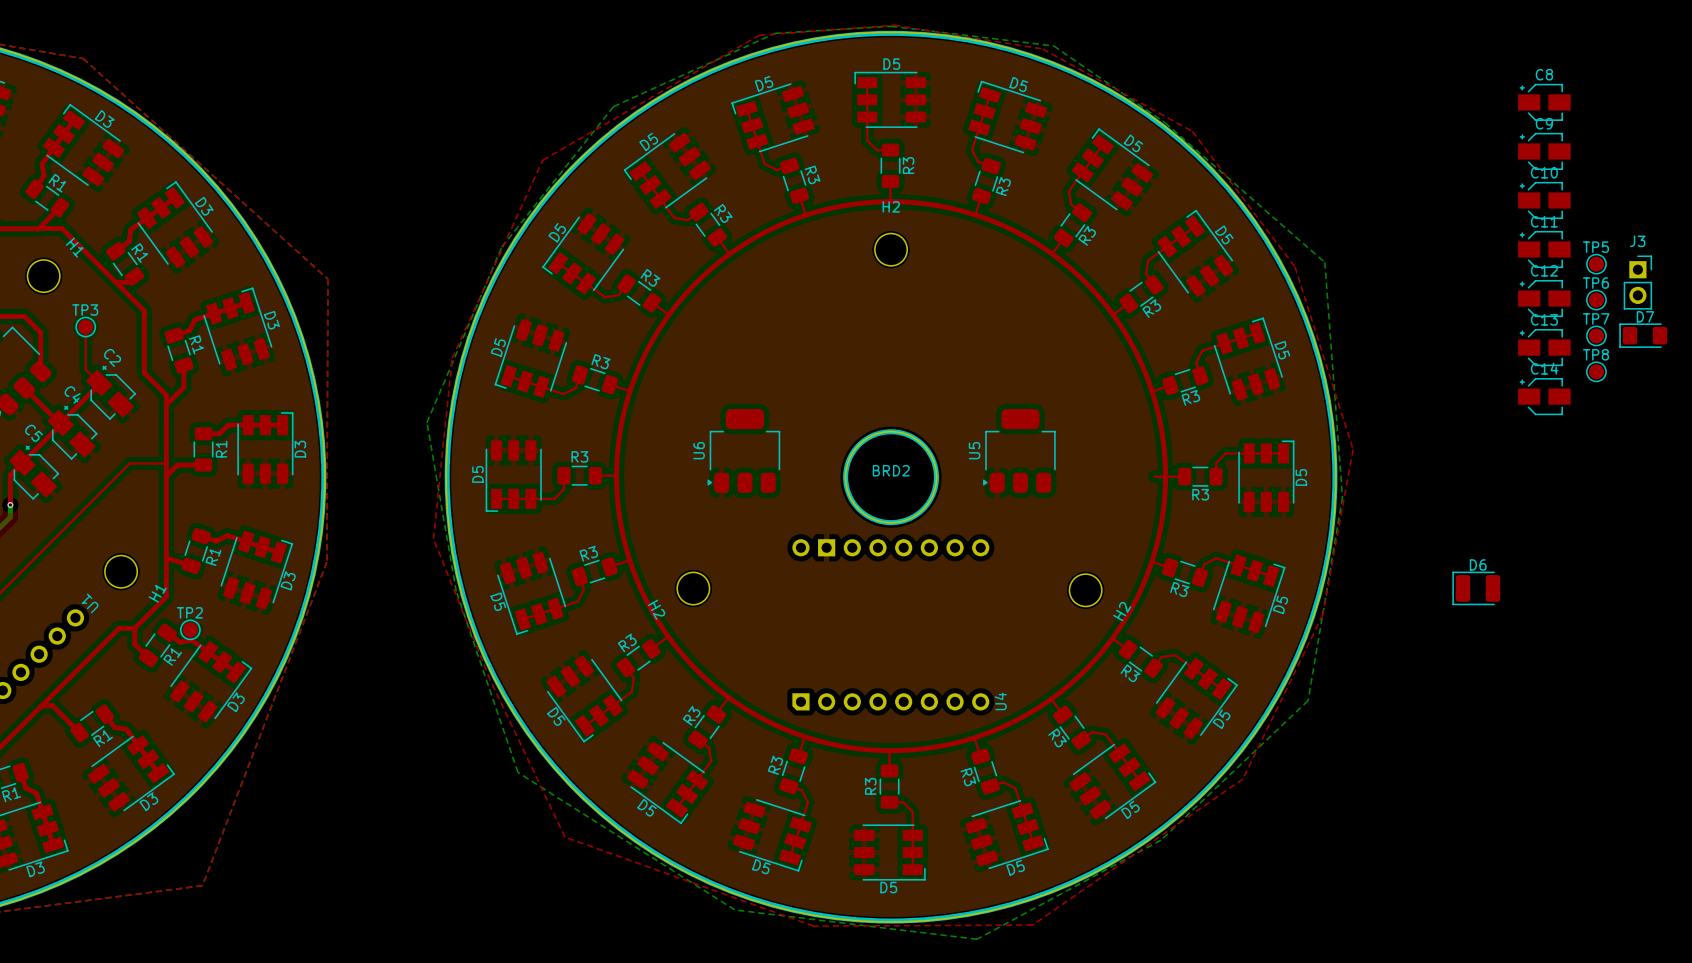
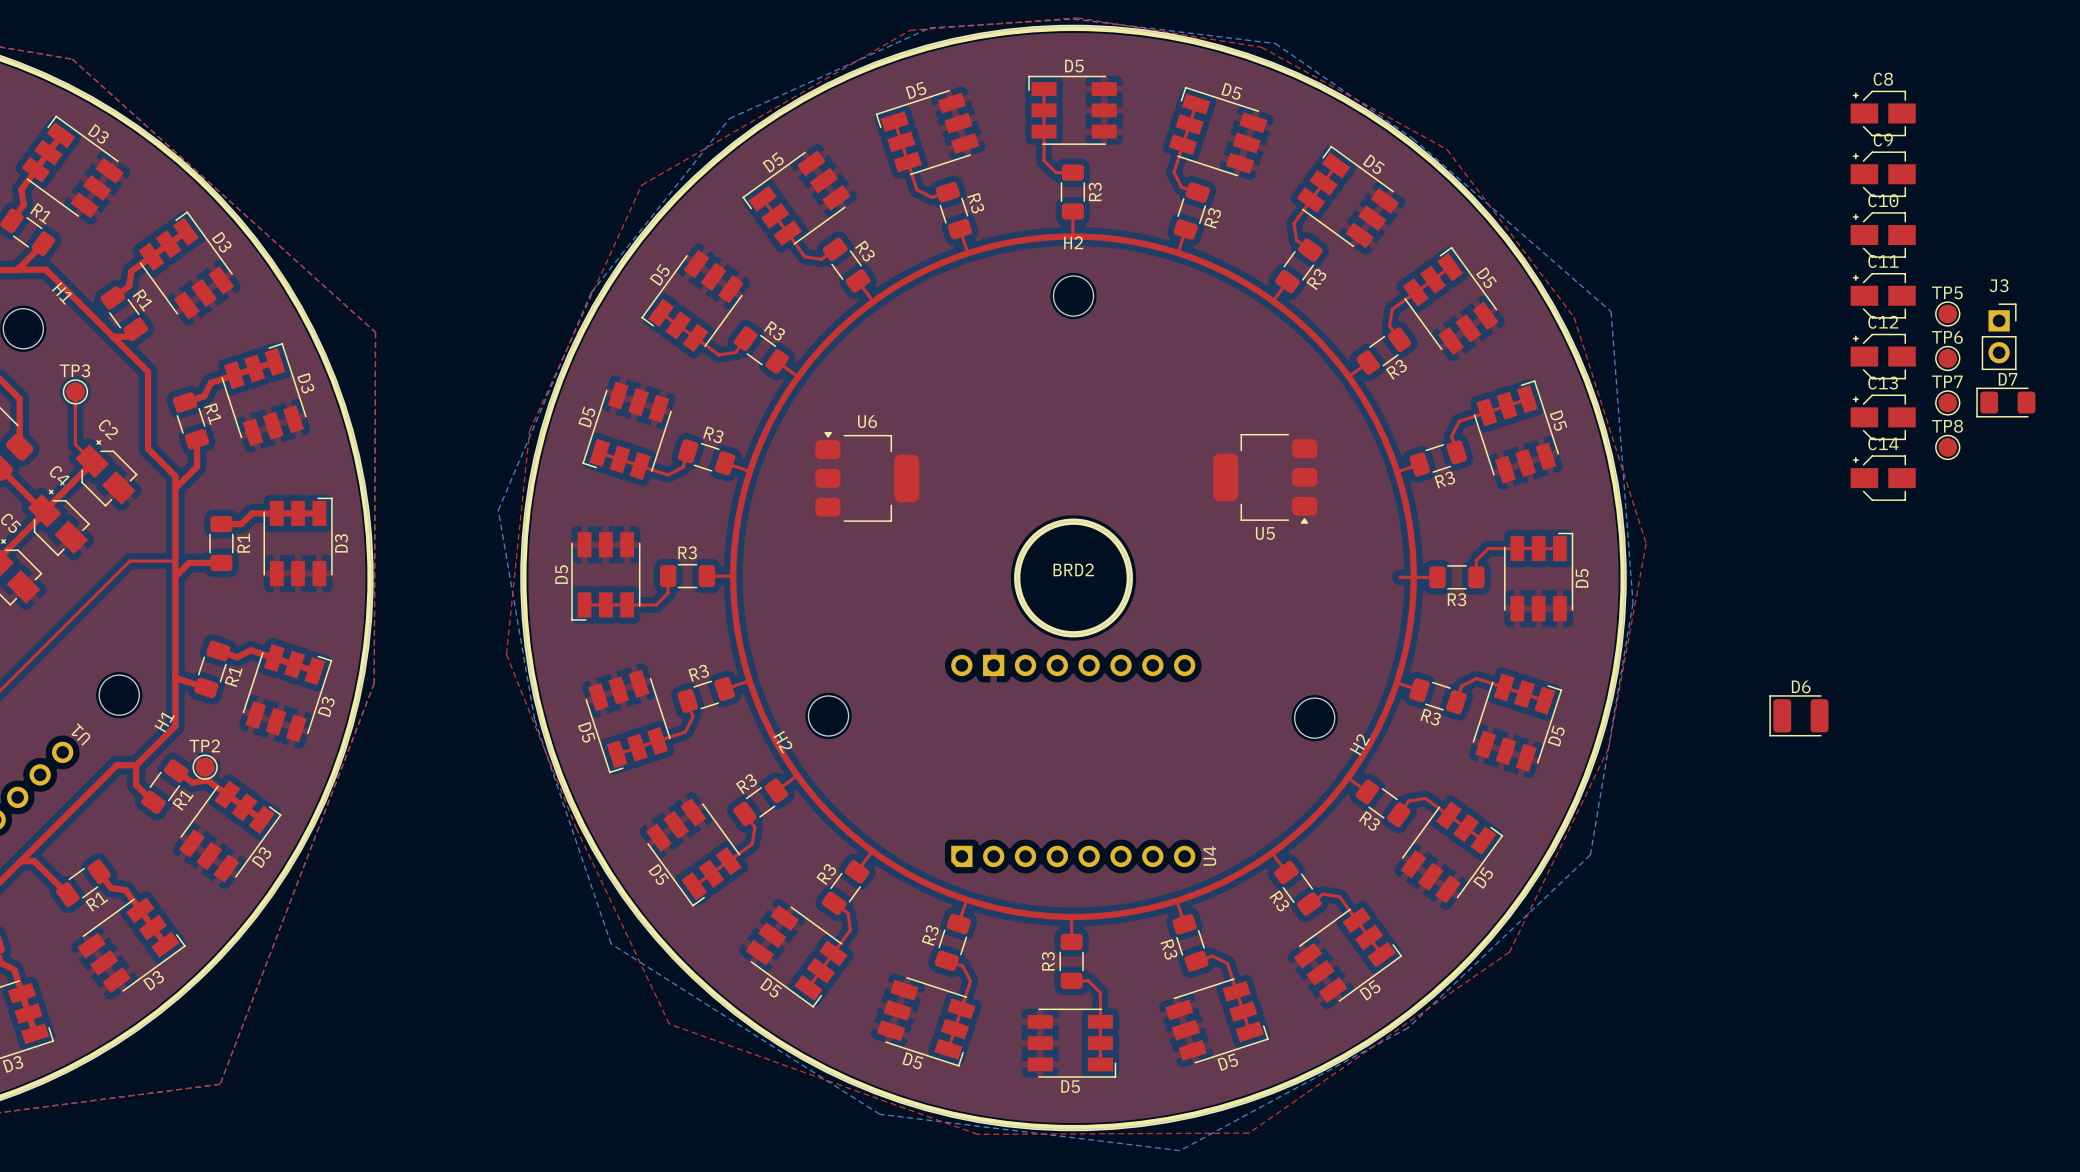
U6 rotation: 0° (743, 450) -> 90° clockwise (867, 476)
U6 position: (743, 450) -> (867, 476)
U5 rotation: 0° (1019, 450) -> 90° counterclockwise (1265, 478)
U5 position: (1019, 450) -> (1265, 478)

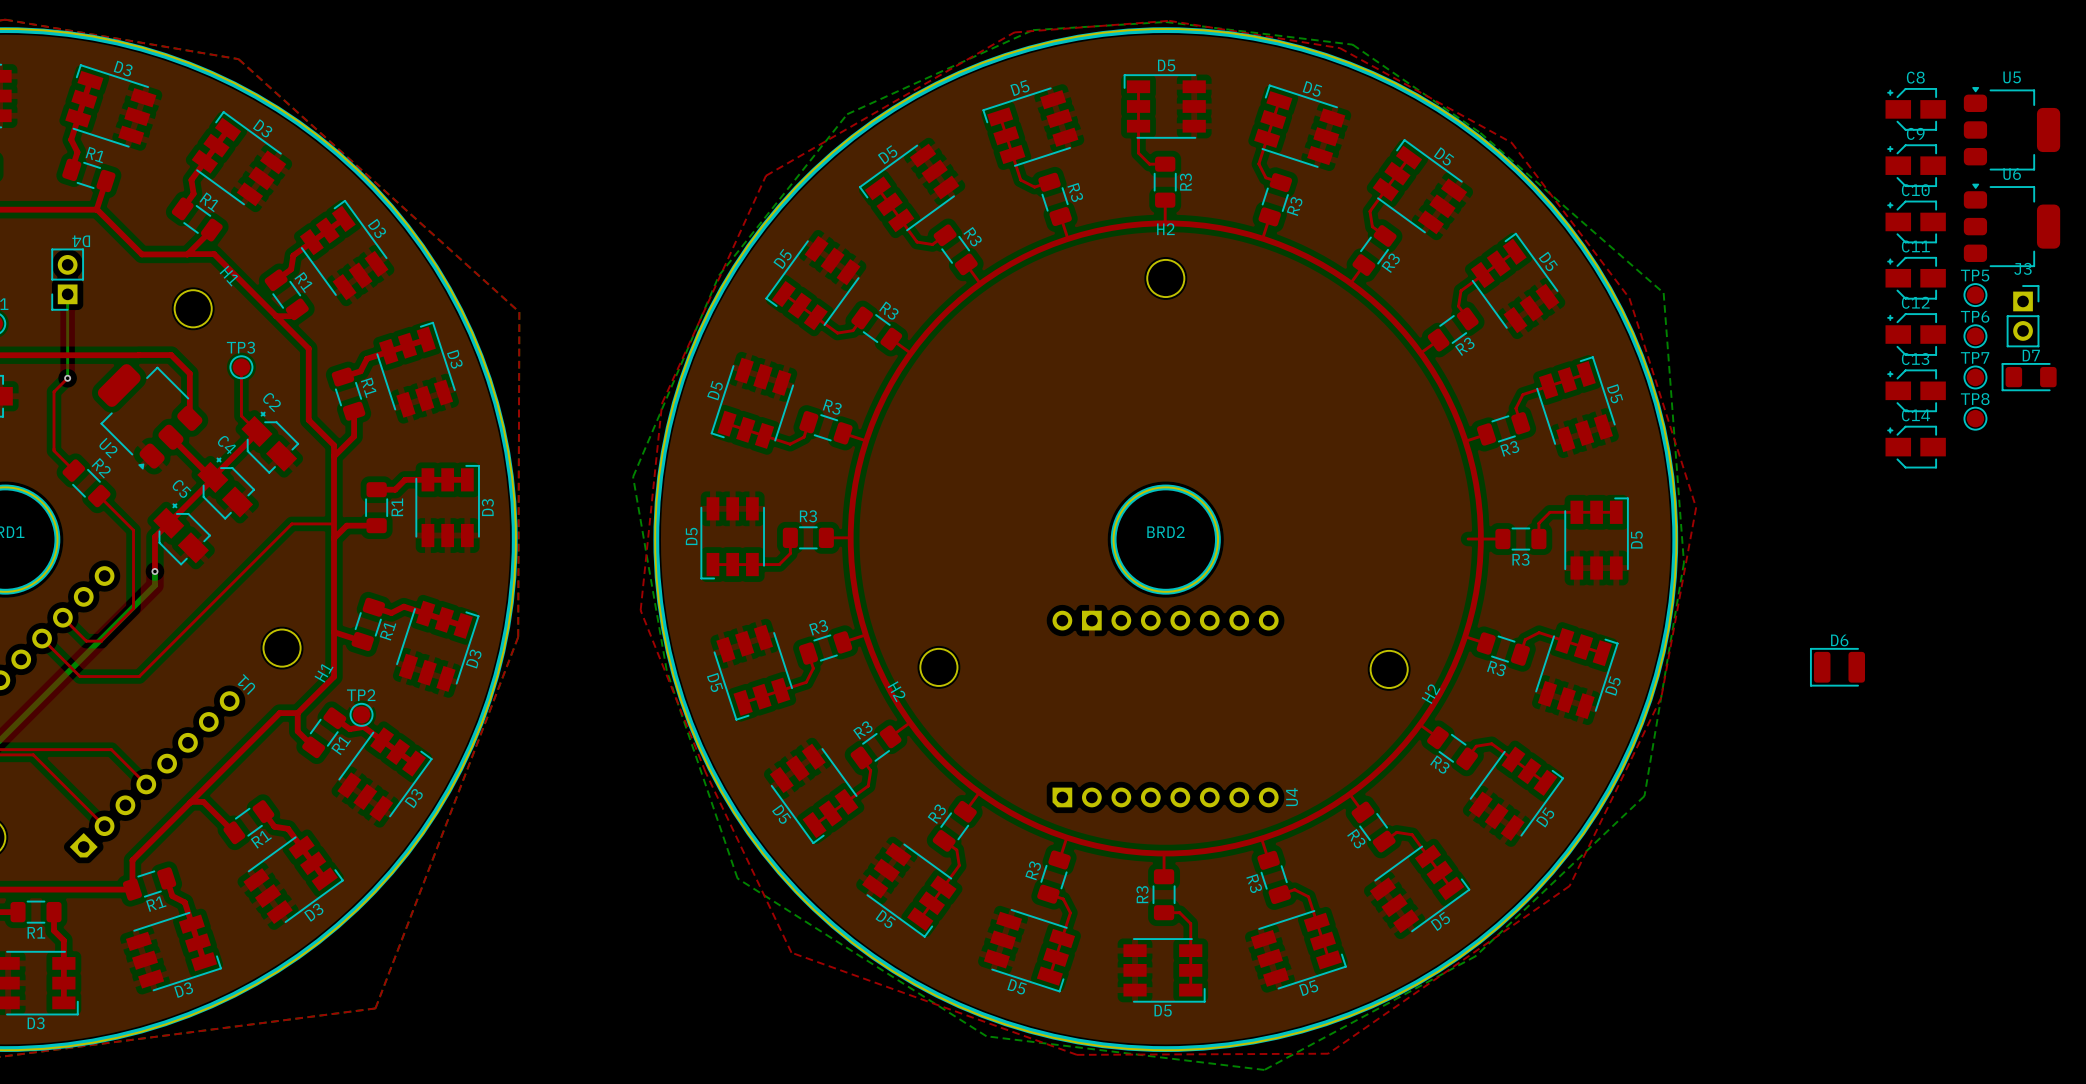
U6 position: (867, 476) -> (2012, 225)
U5 rotation: 0° (1265, 478) -> 180° (2012, 128)
U5 position: (1265, 478) -> (2012, 128)

